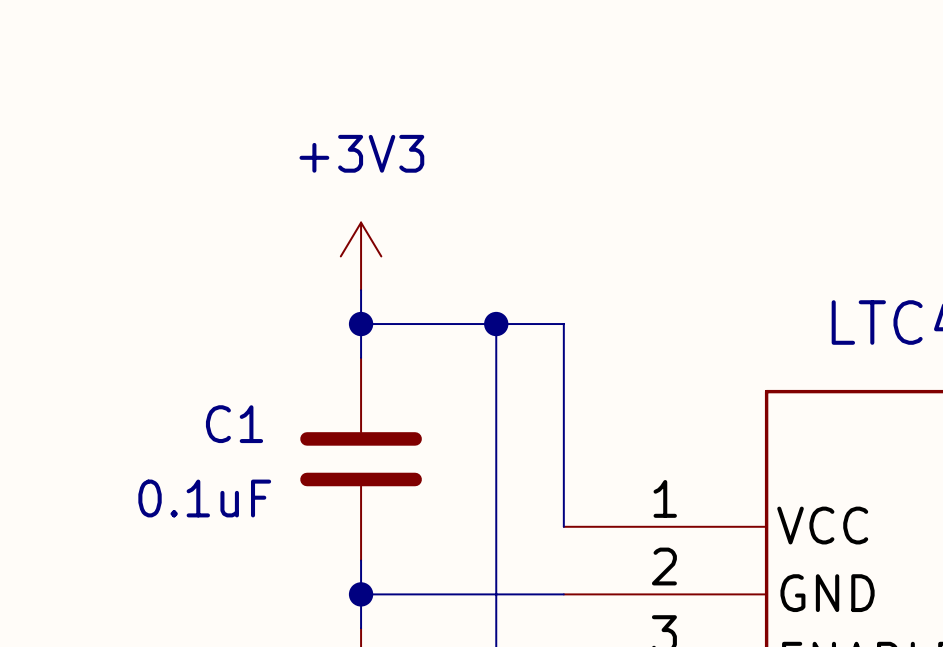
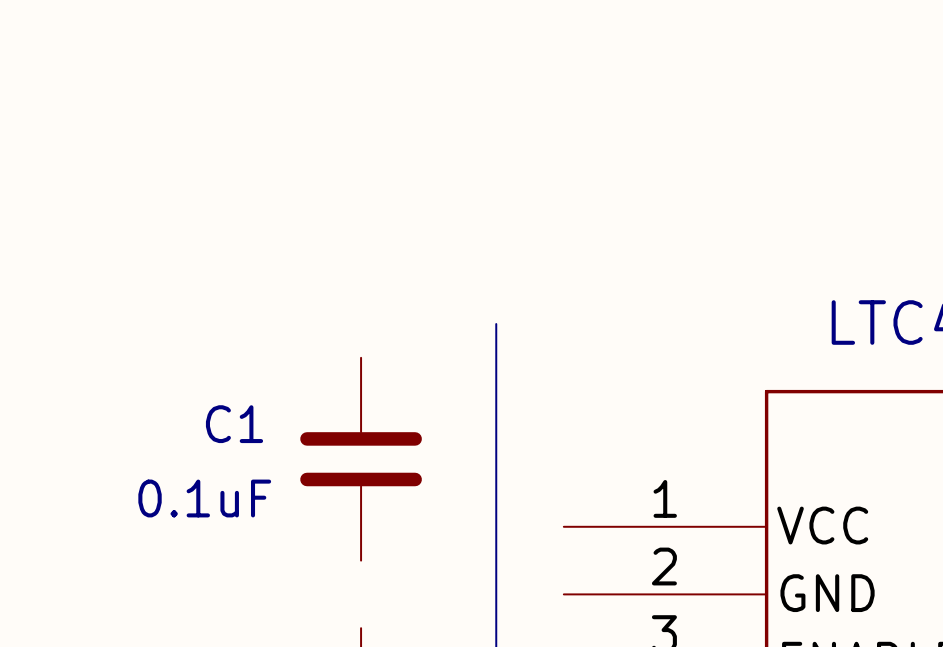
power symbol: +3V3 (361, 256) -> none
wire: (361, 290) (361, 357) -> none
wire: (361, 324) (563, 324) (563, 526) -> none
junction: (361, 324) -> none
junction: (496, 324) -> none
wire: (361, 560) (361, 628) -> none
wire: (361, 594) (563, 594) -> none
junction: (361, 594) -> none

